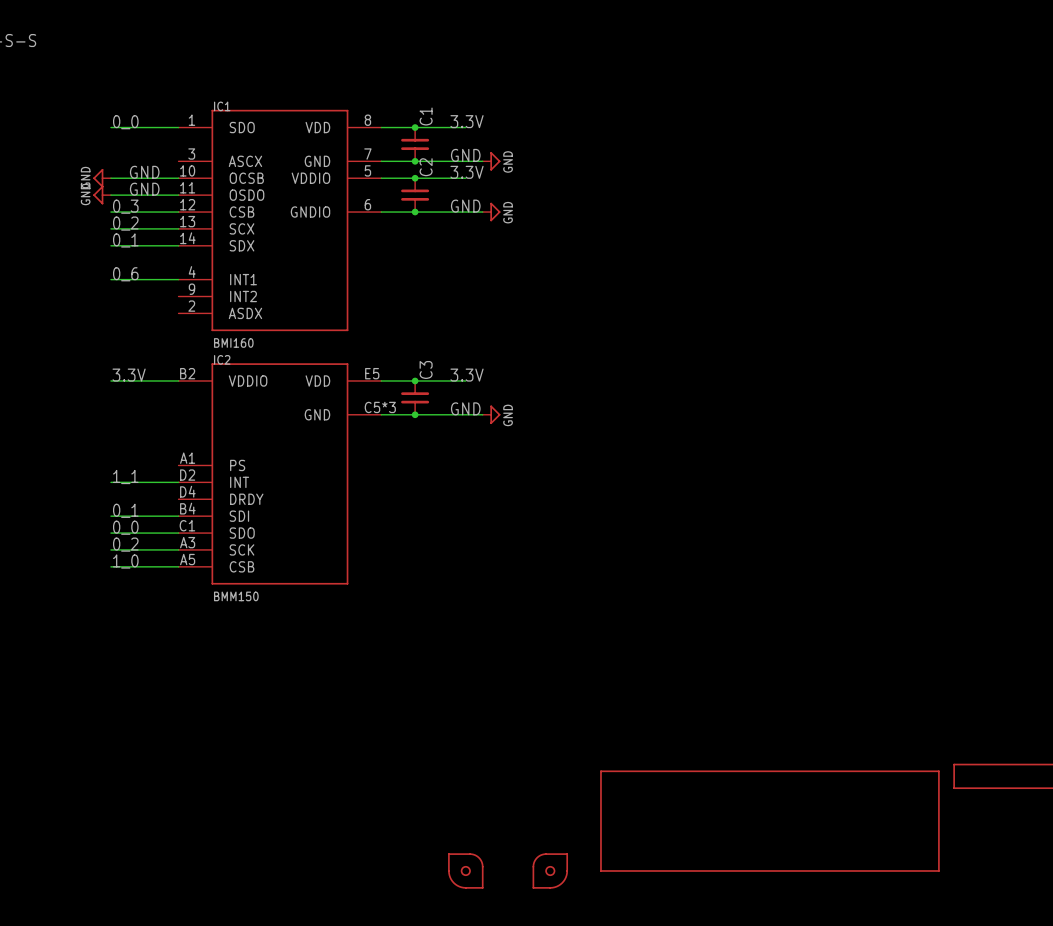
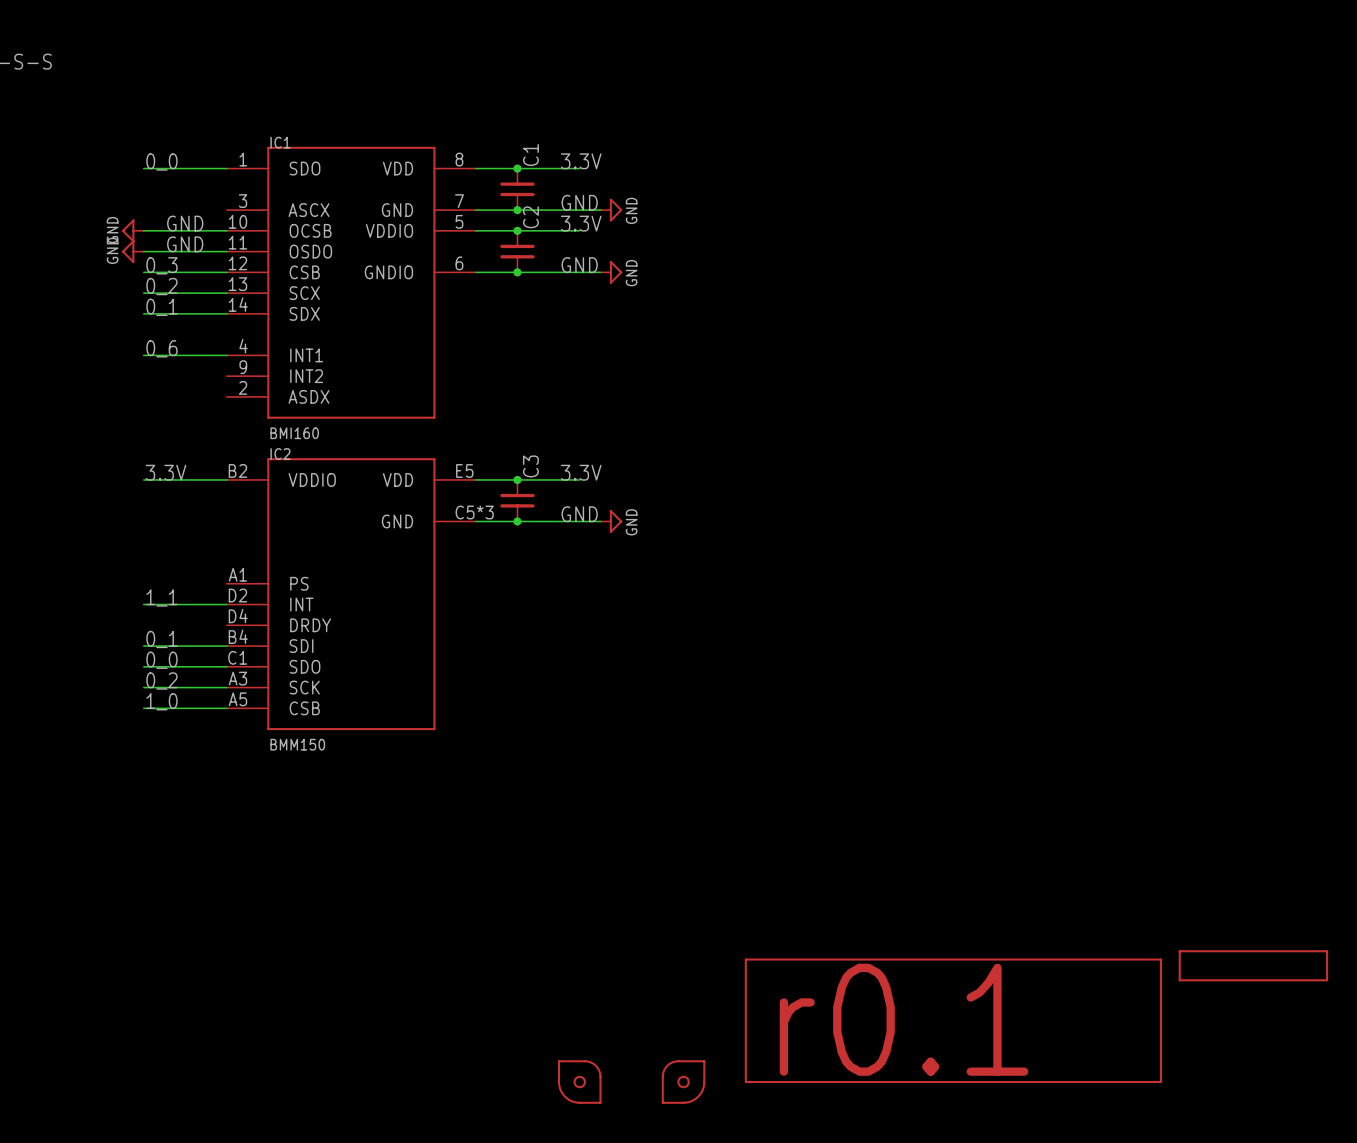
part value: none -> r0.1 (904, 1019)

